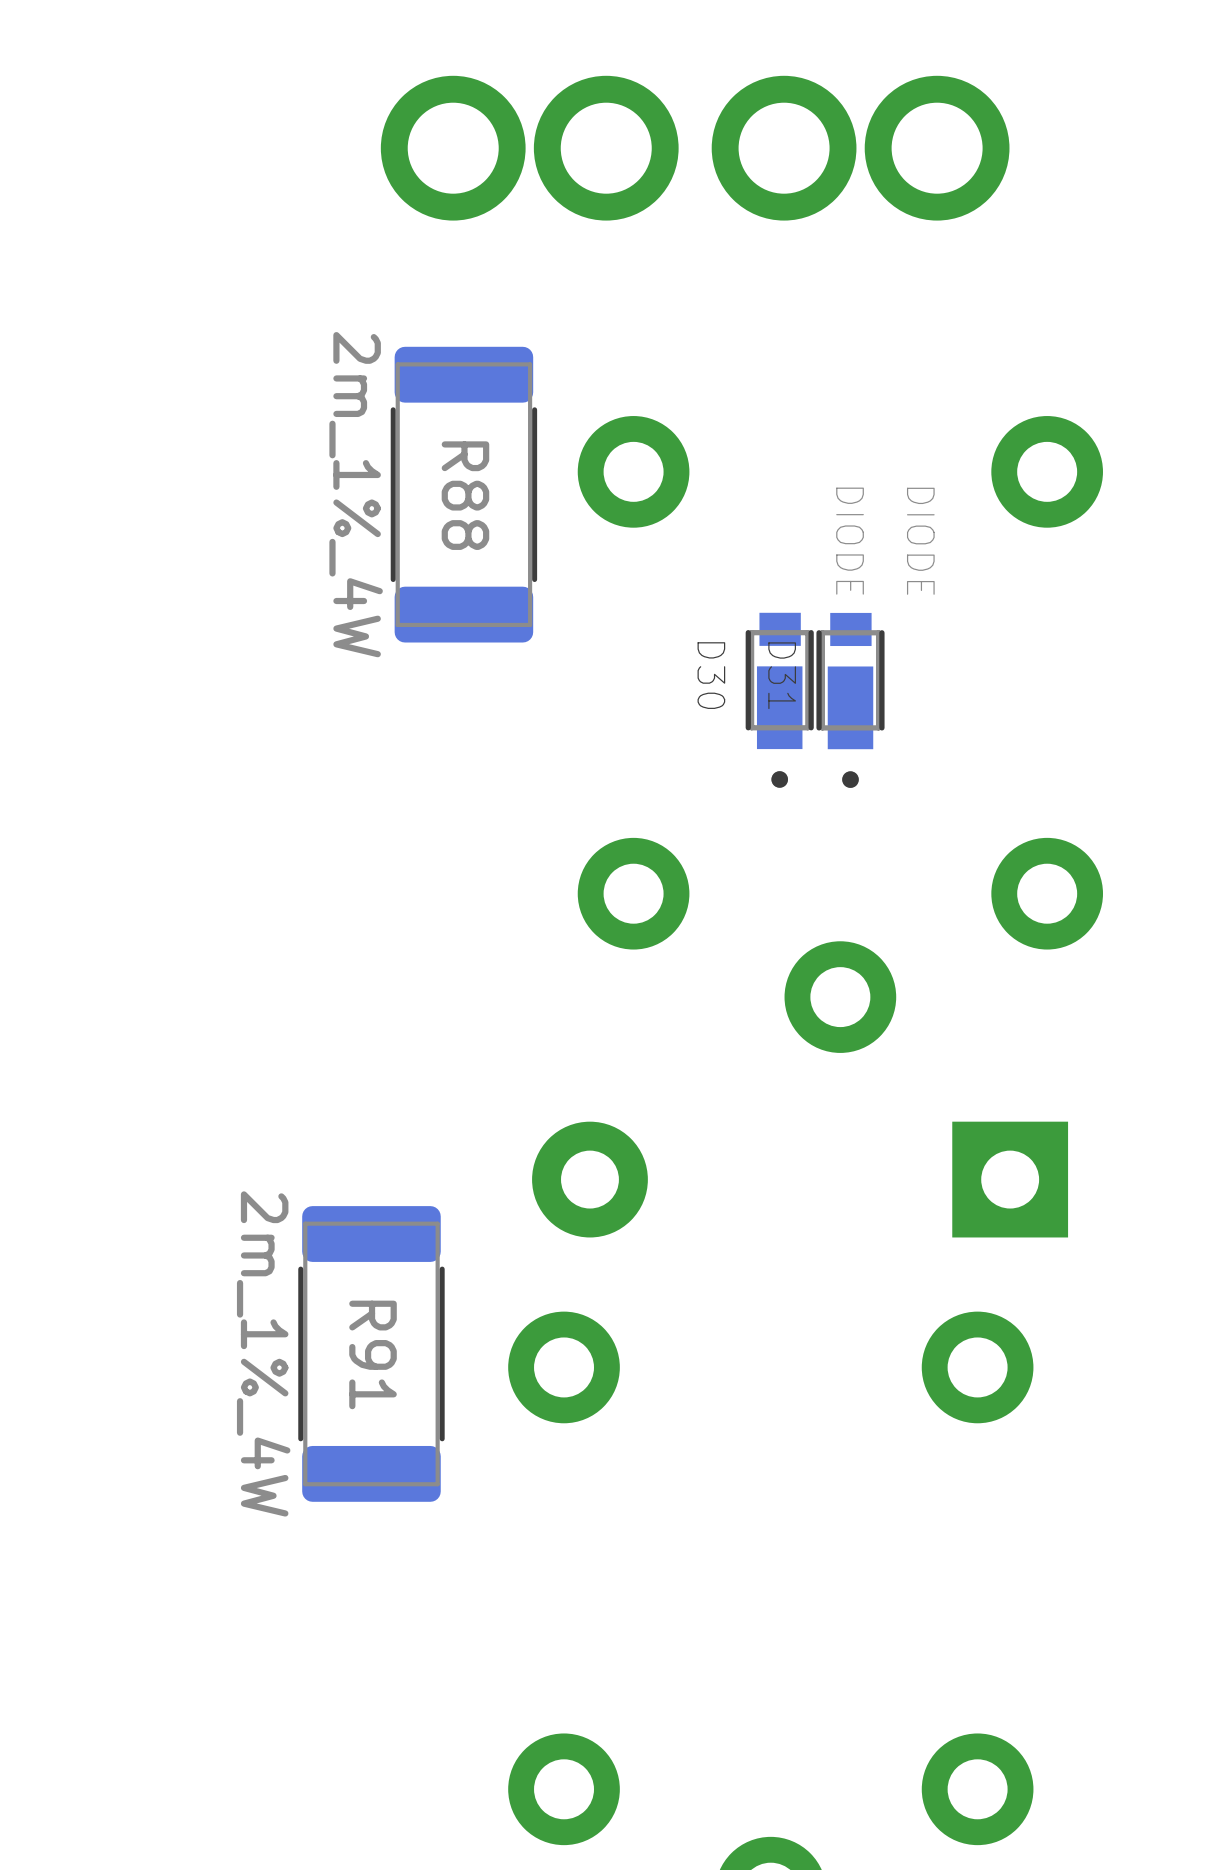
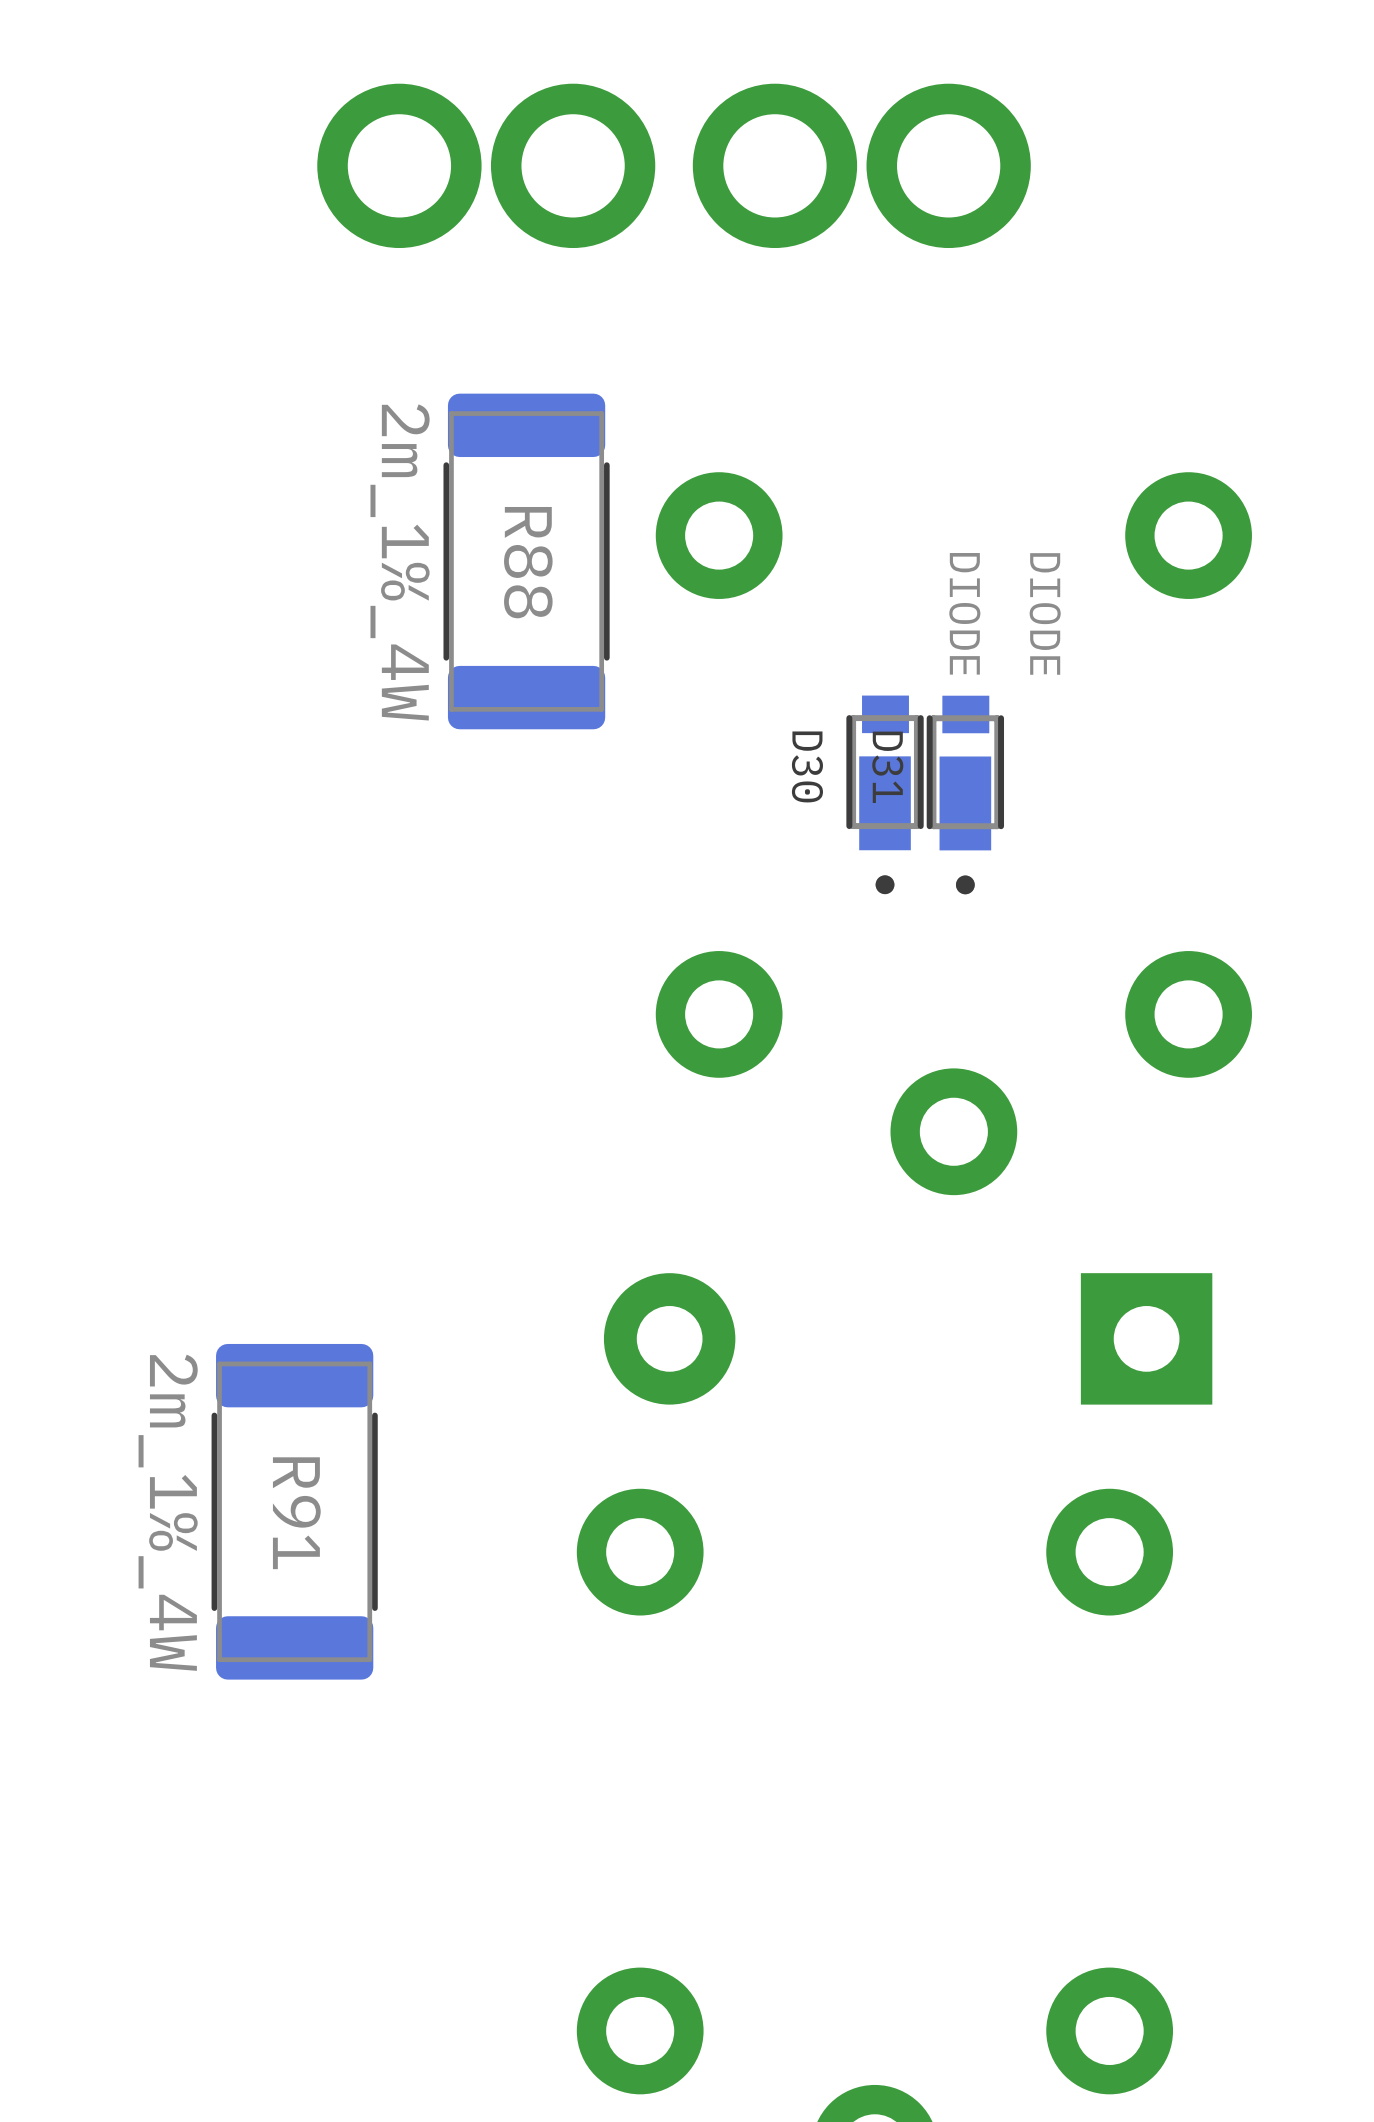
part position: (695, 148) -> (674, 165)
R91 position: (371, 1353) -> (294, 1511)

